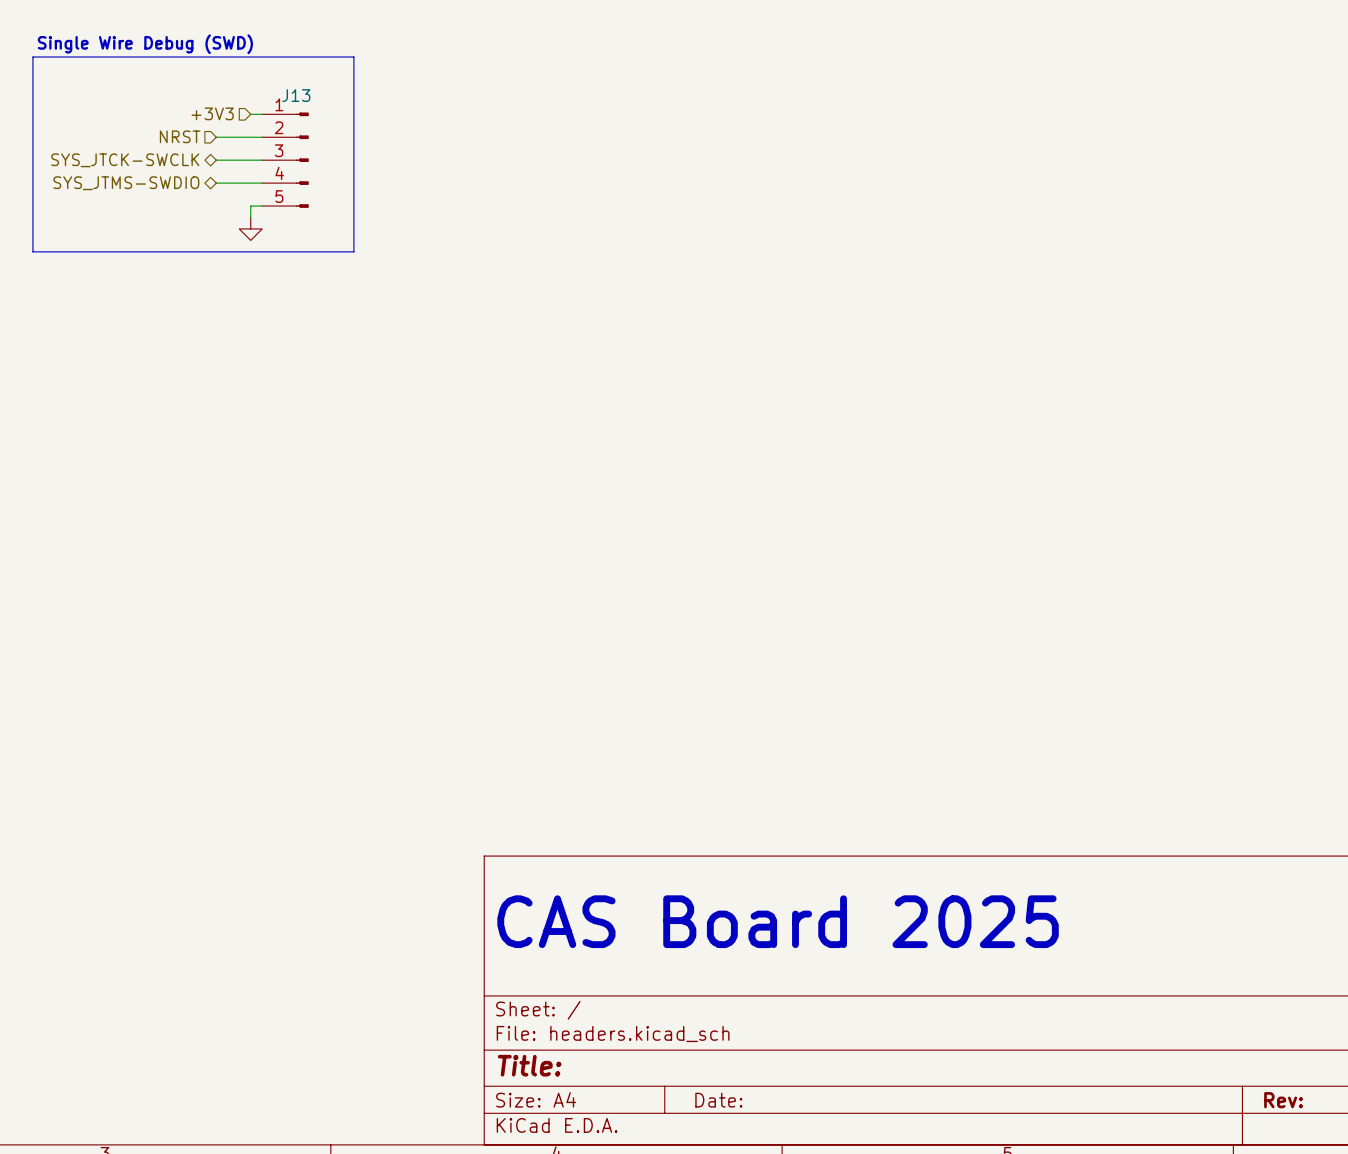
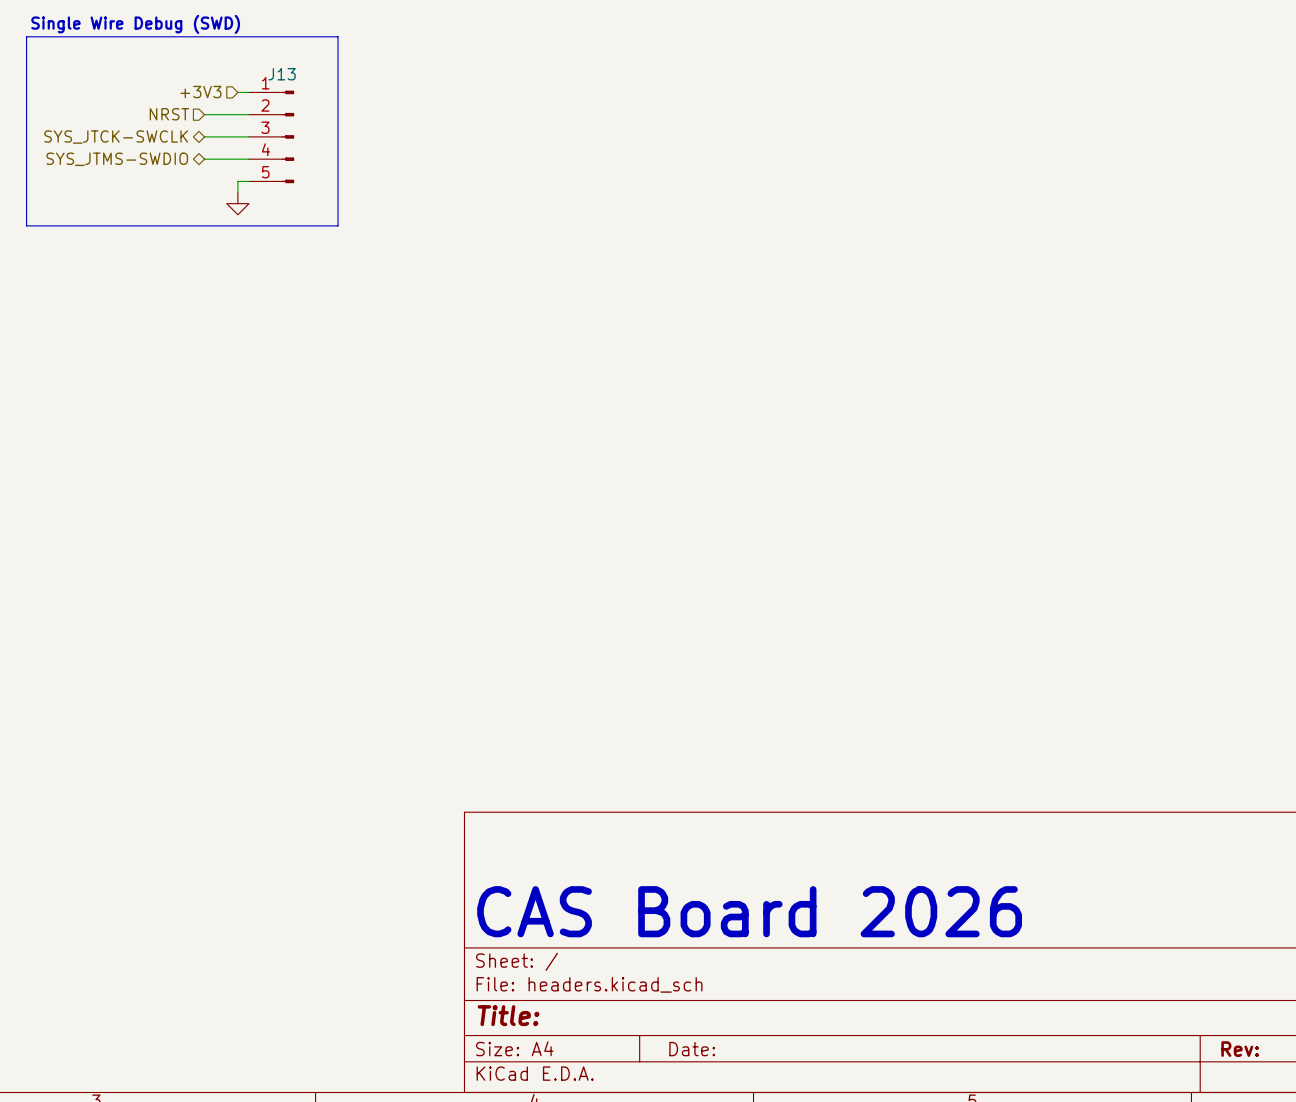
text: CAS Board 2025 (778, 921) -> CAS Board 2026 (749, 911)

